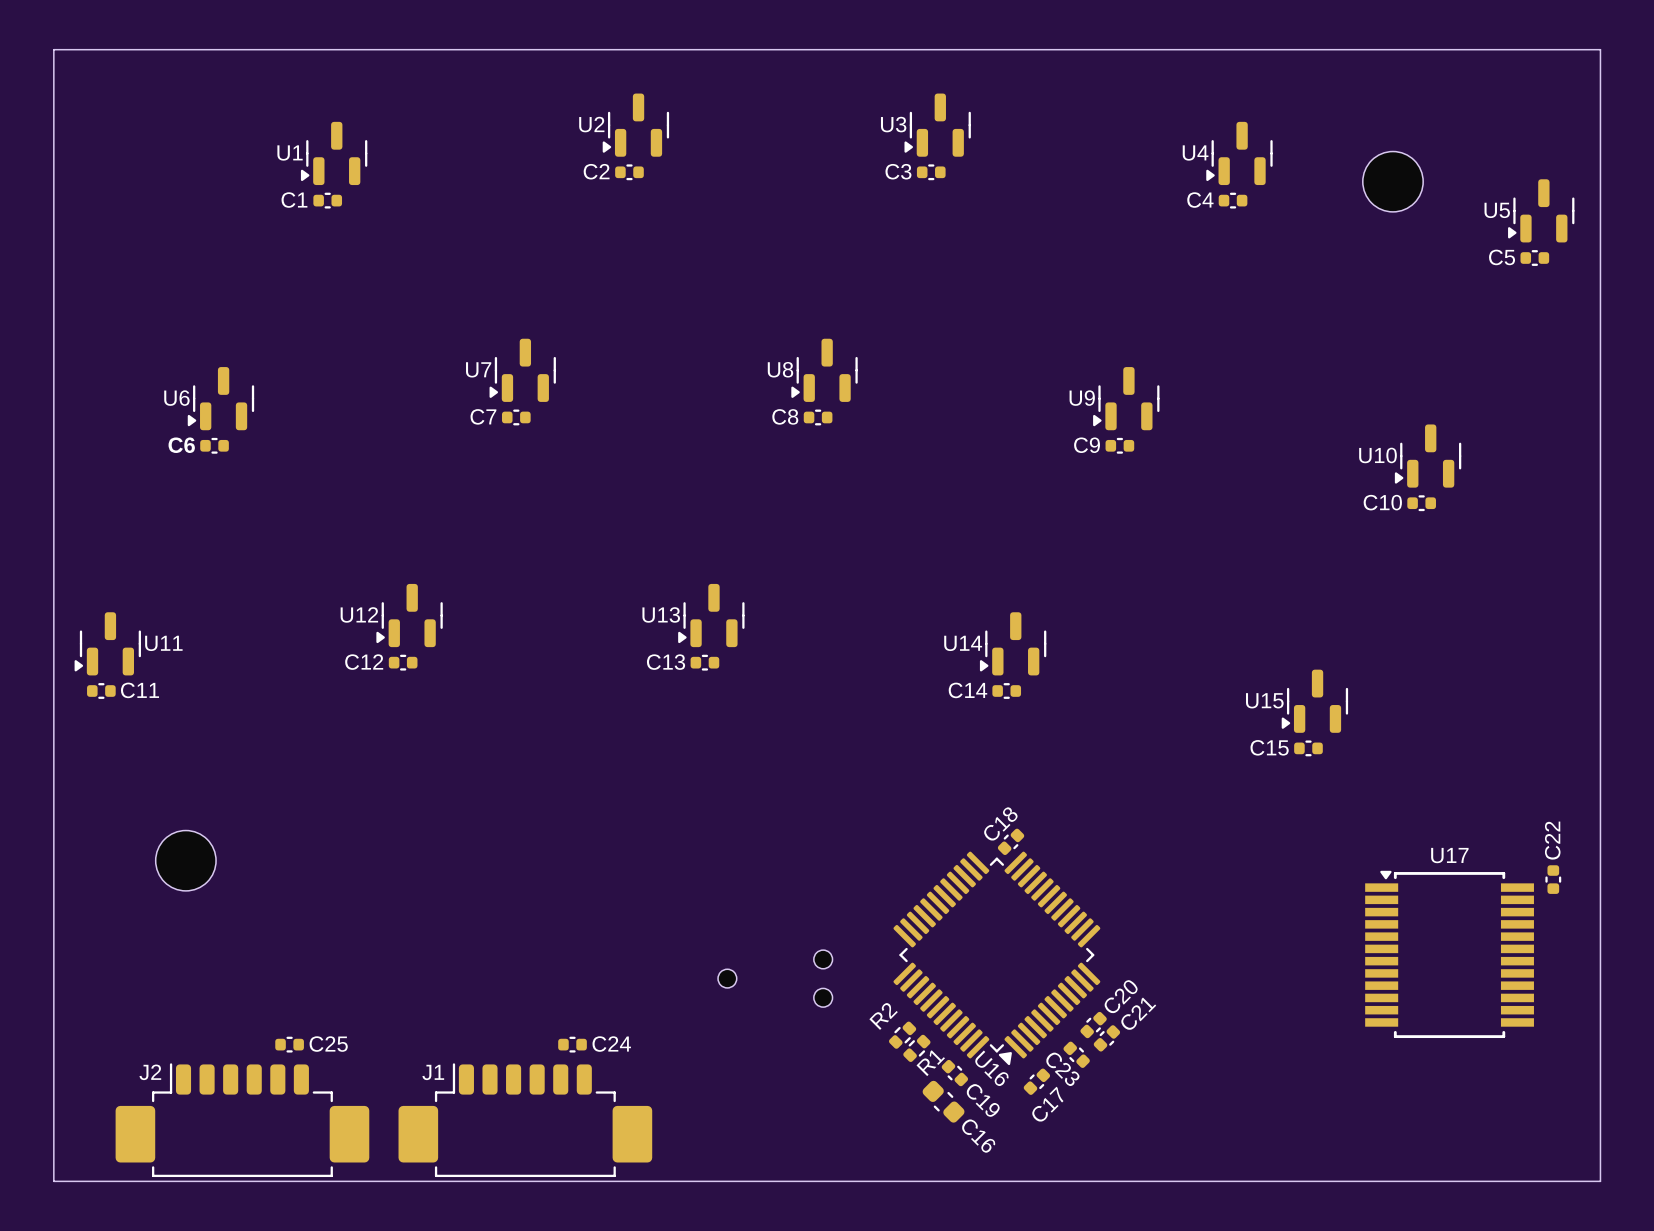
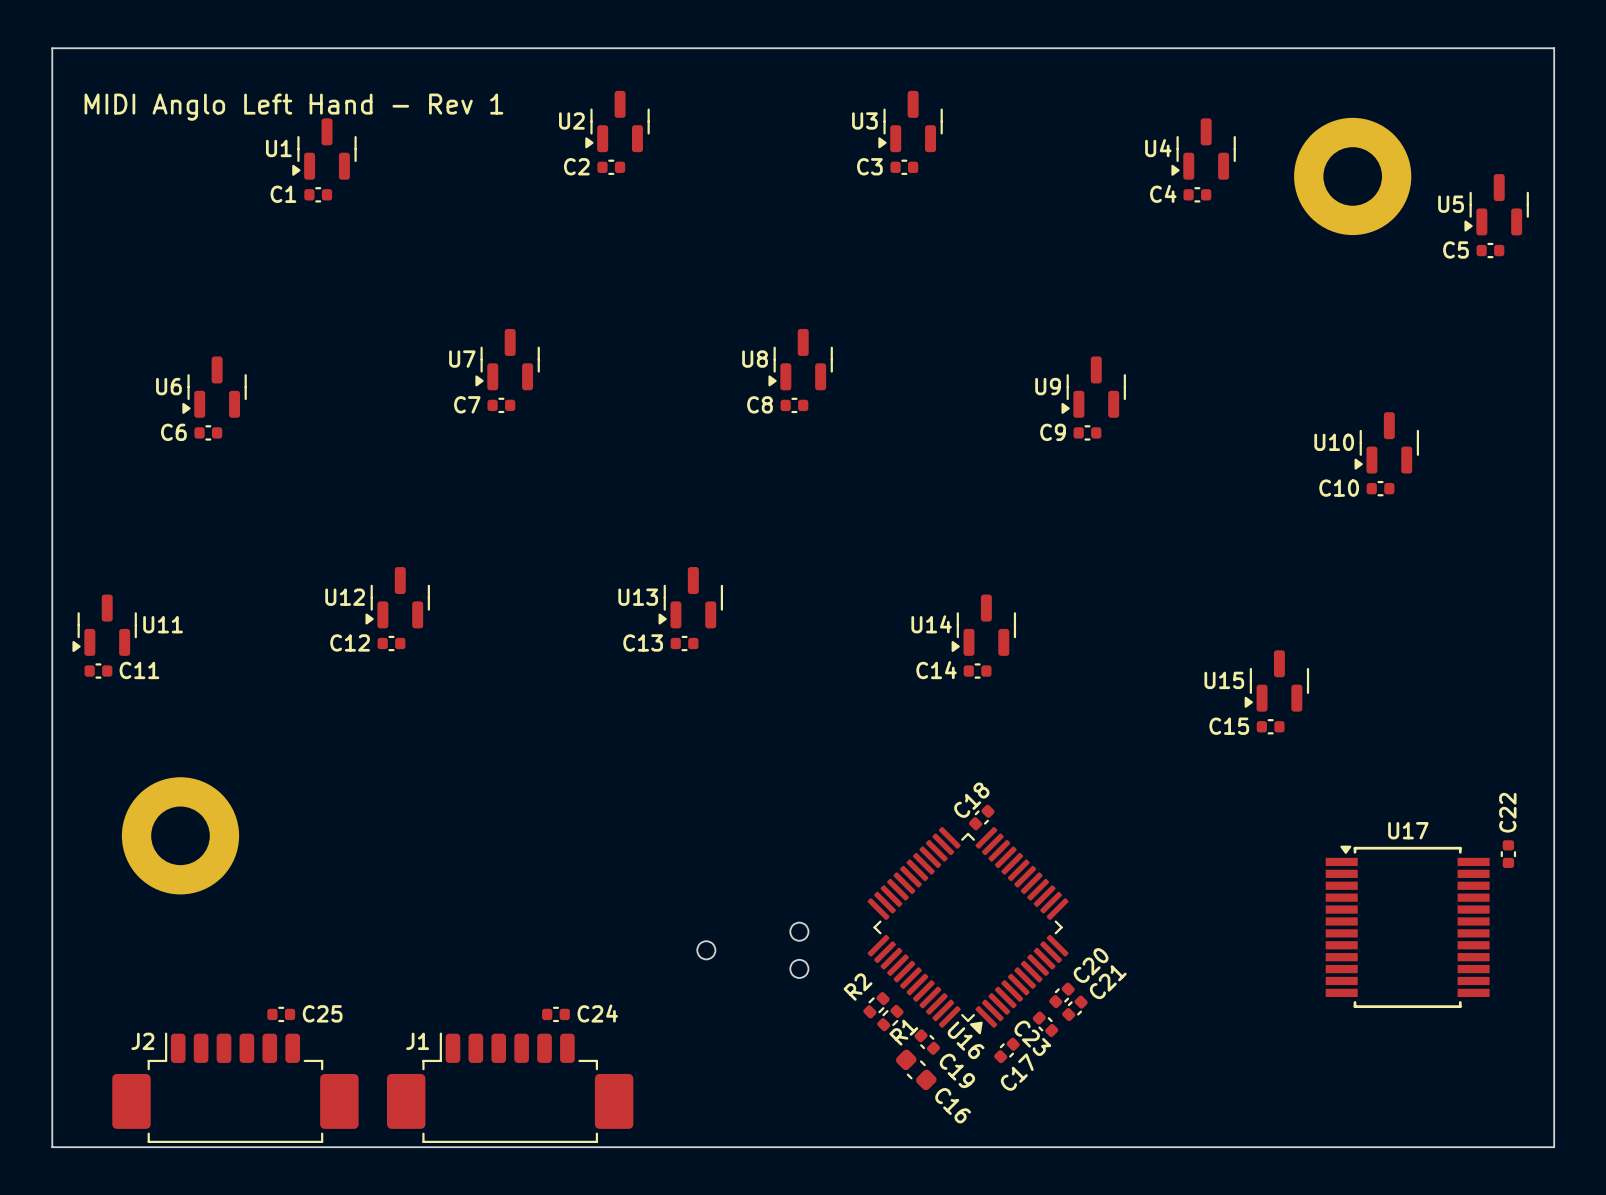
text: none -> MIDI Anglo Left Hand - Rev 1 (293, 107)
part footprint: [1362, 151, 1424, 212] -> [1294, 117, 1412, 236]
part footprint: [155, 830, 217, 891] -> [121, 777, 240, 895]

